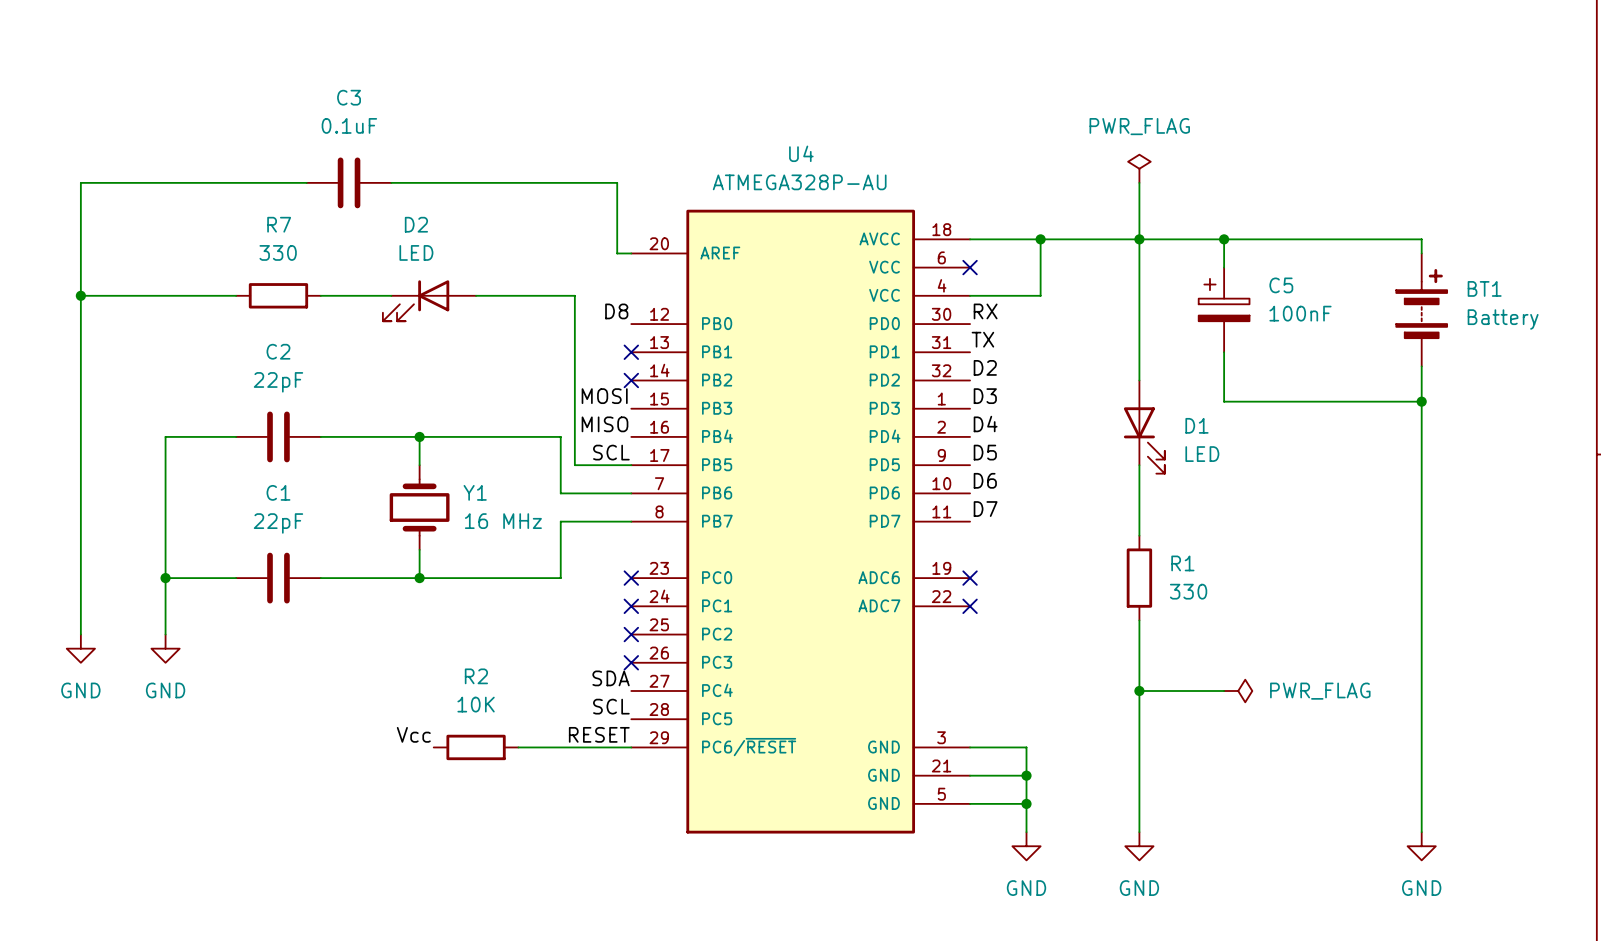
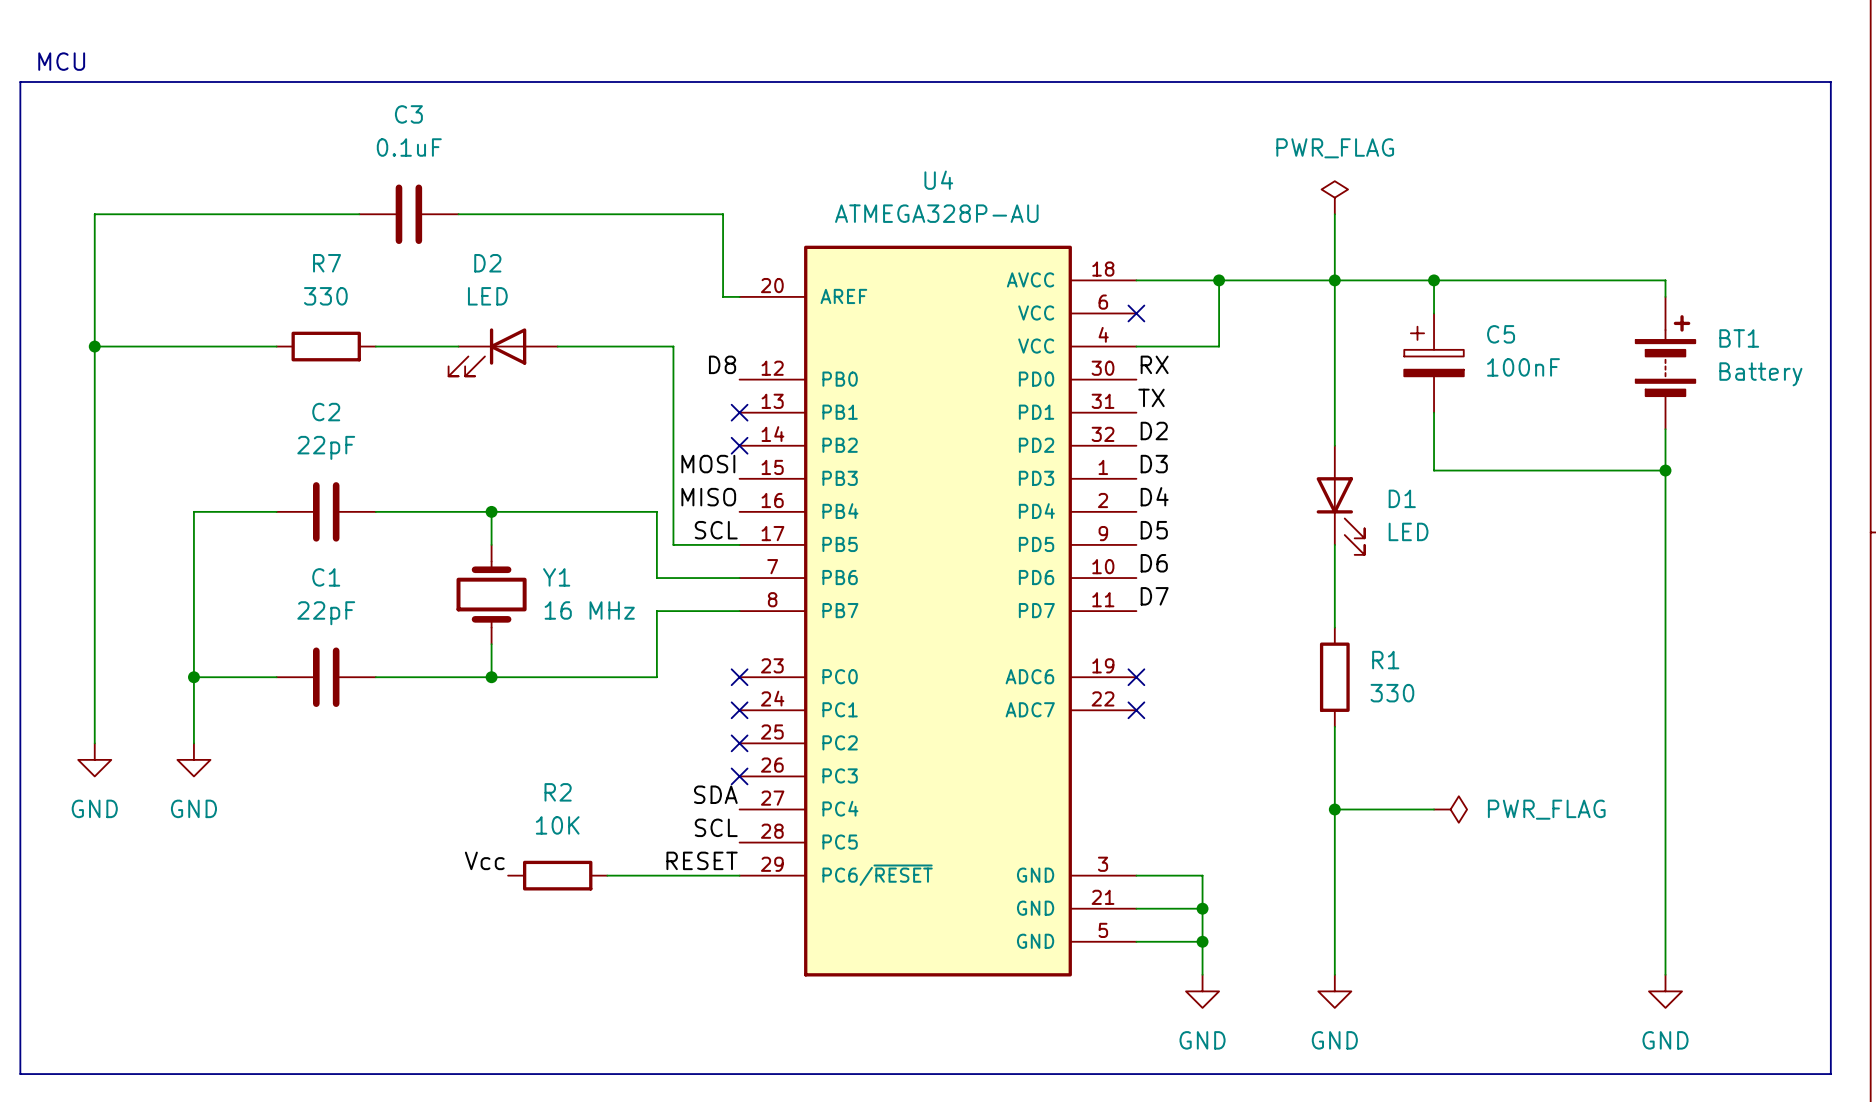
text: none -> MCU (61, 61)
line: none -> (20, 81) (1830, 81) (1830, 1074) (20, 1074) (20, 81)

